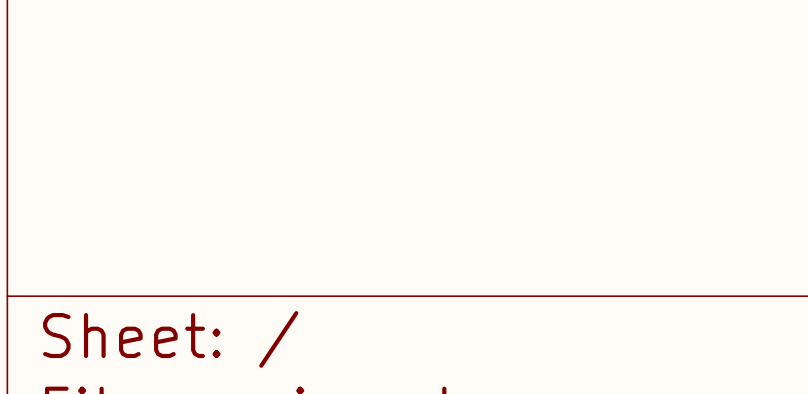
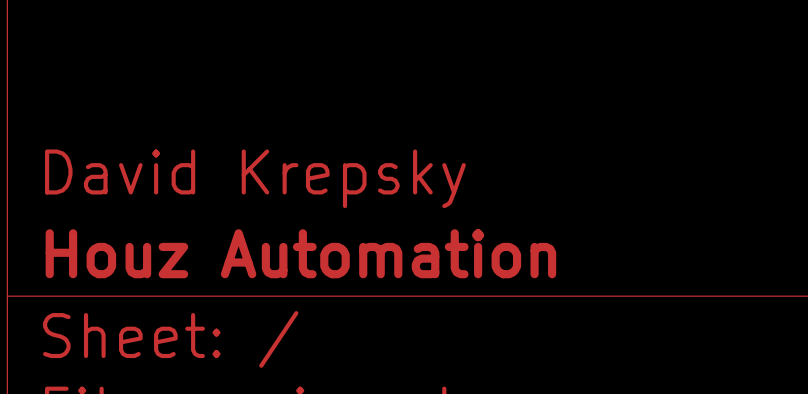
title block: none -> David Krepsky (255, 178)
title block: none -> Houz Automation (300, 253)

